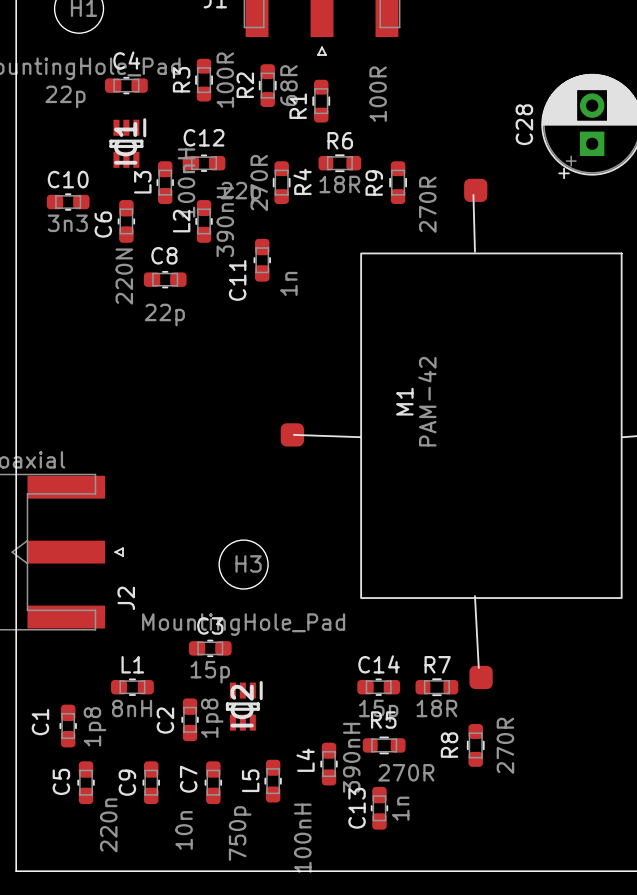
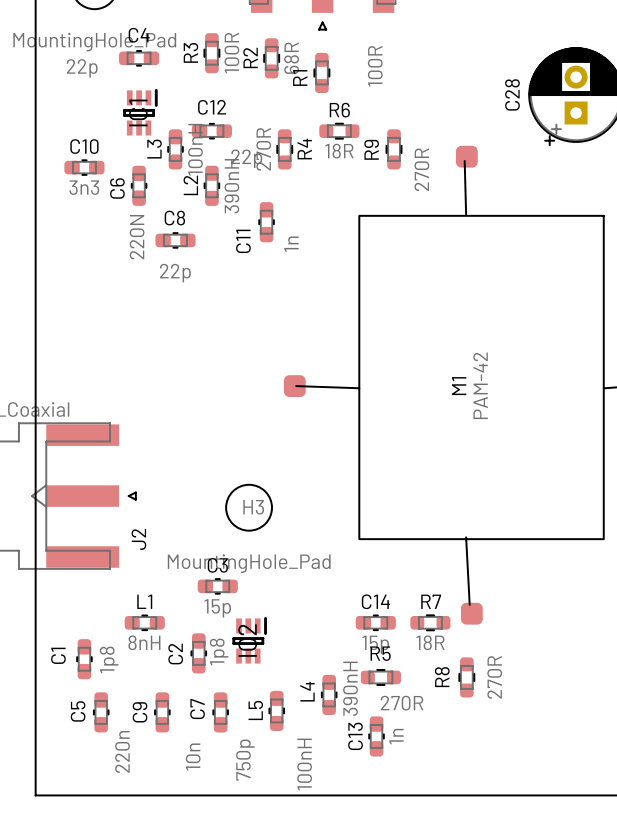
M1 name position: M1 (404, 401) -> M1 (459, 386)
M1 value position: PAM-42 (427, 401) -> PAM-42 (480, 385)

